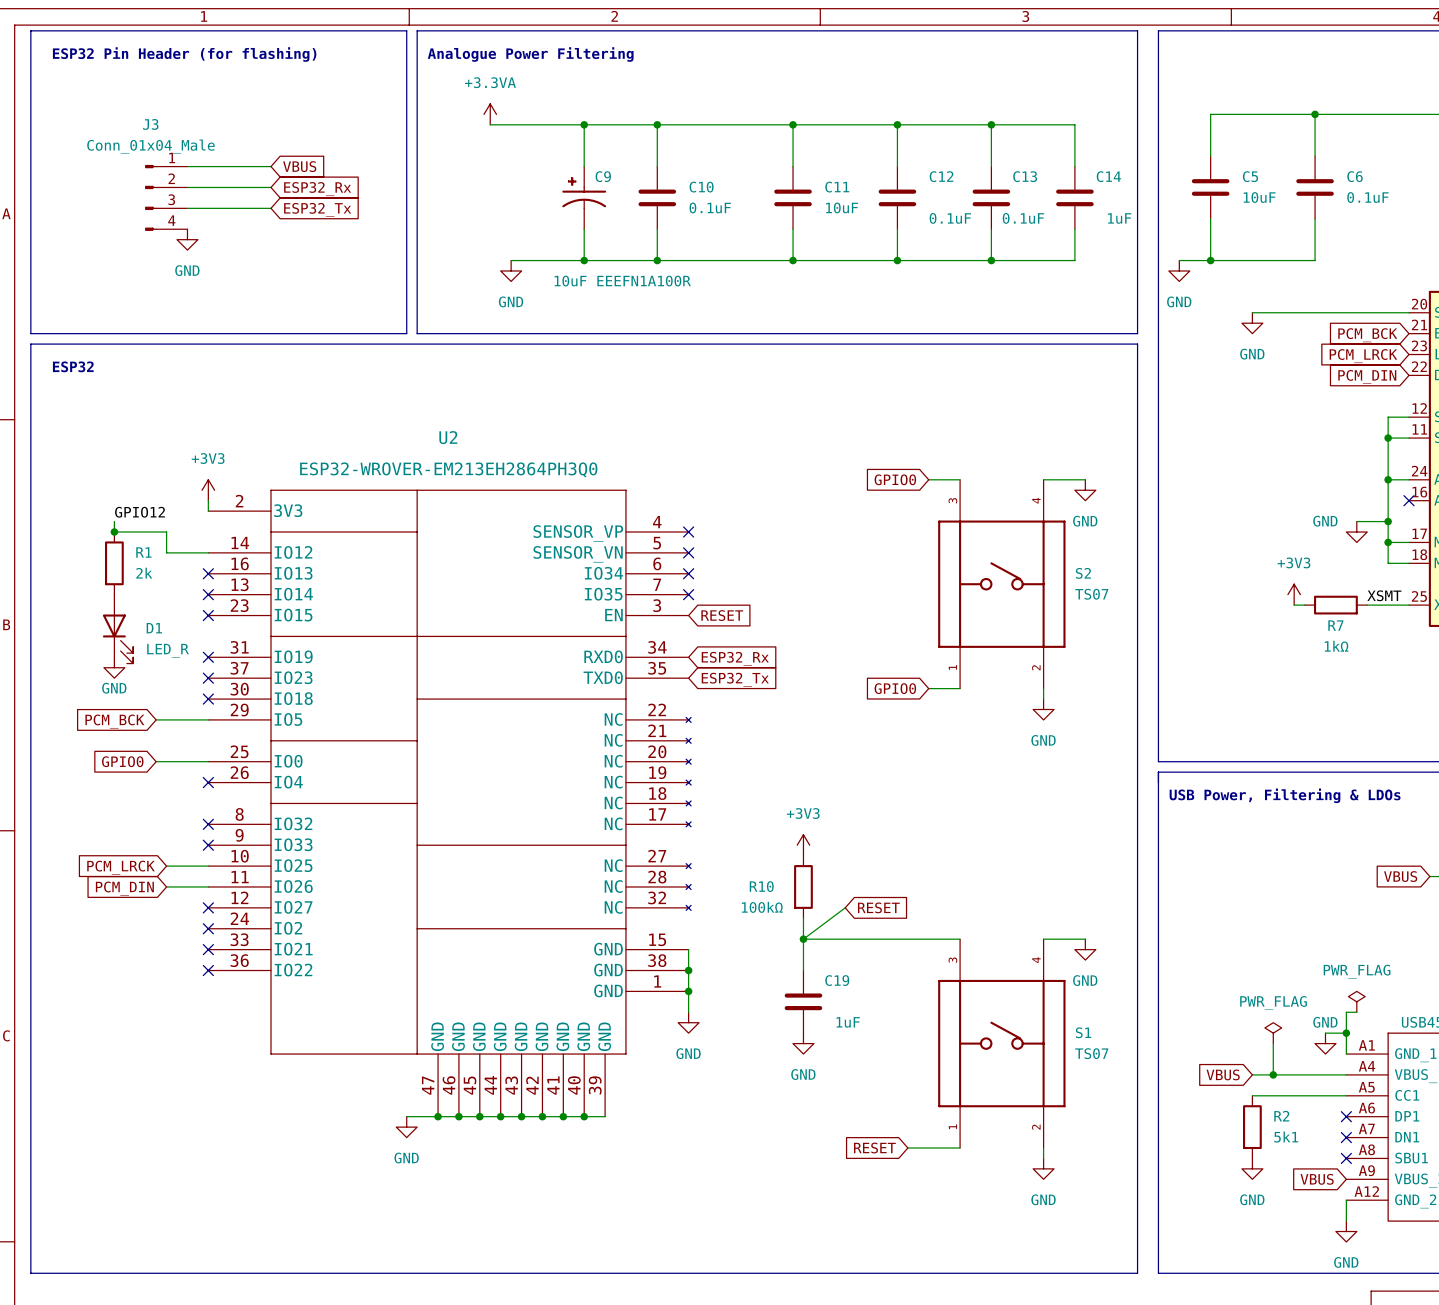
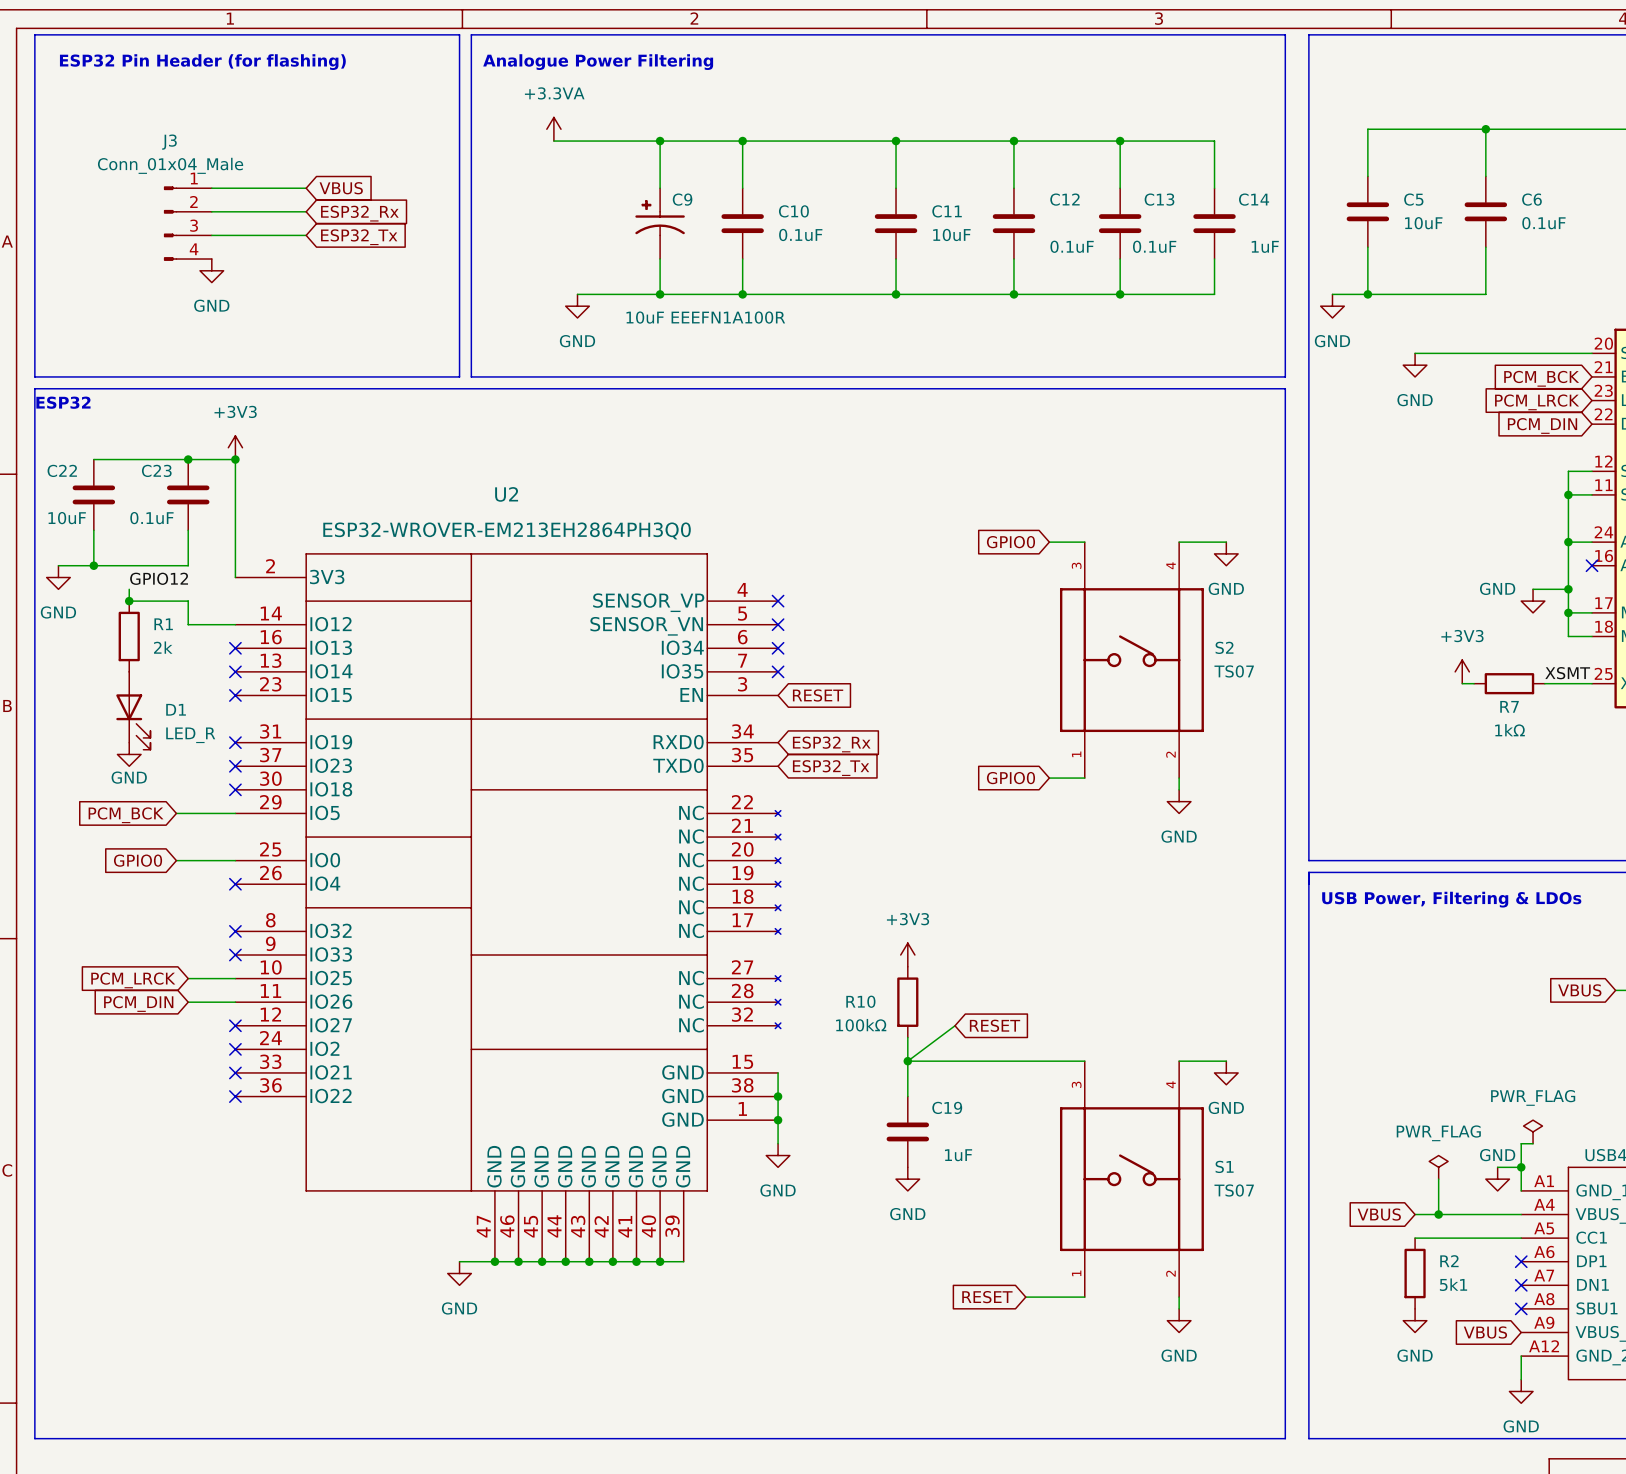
text position: ESP32 (73, 366) -> ESP32 (63, 402)
wire: none -> (93, 459) (235, 459) (235, 565)
junction: none -> (188, 459)
junction: none -> (235, 459)
C22: none -> 10uF (93, 494)
C23: none -> 0.1uF (188, 494)
wire: none -> (93, 530) (93, 565)
wire: none -> (188, 530) (188, 565) (58, 565)
power symbol position: +3V3 (208, 490) -> +3V3 (235, 447)
junction: none -> (93, 565)
power symbol: none -> GND (58, 577)

